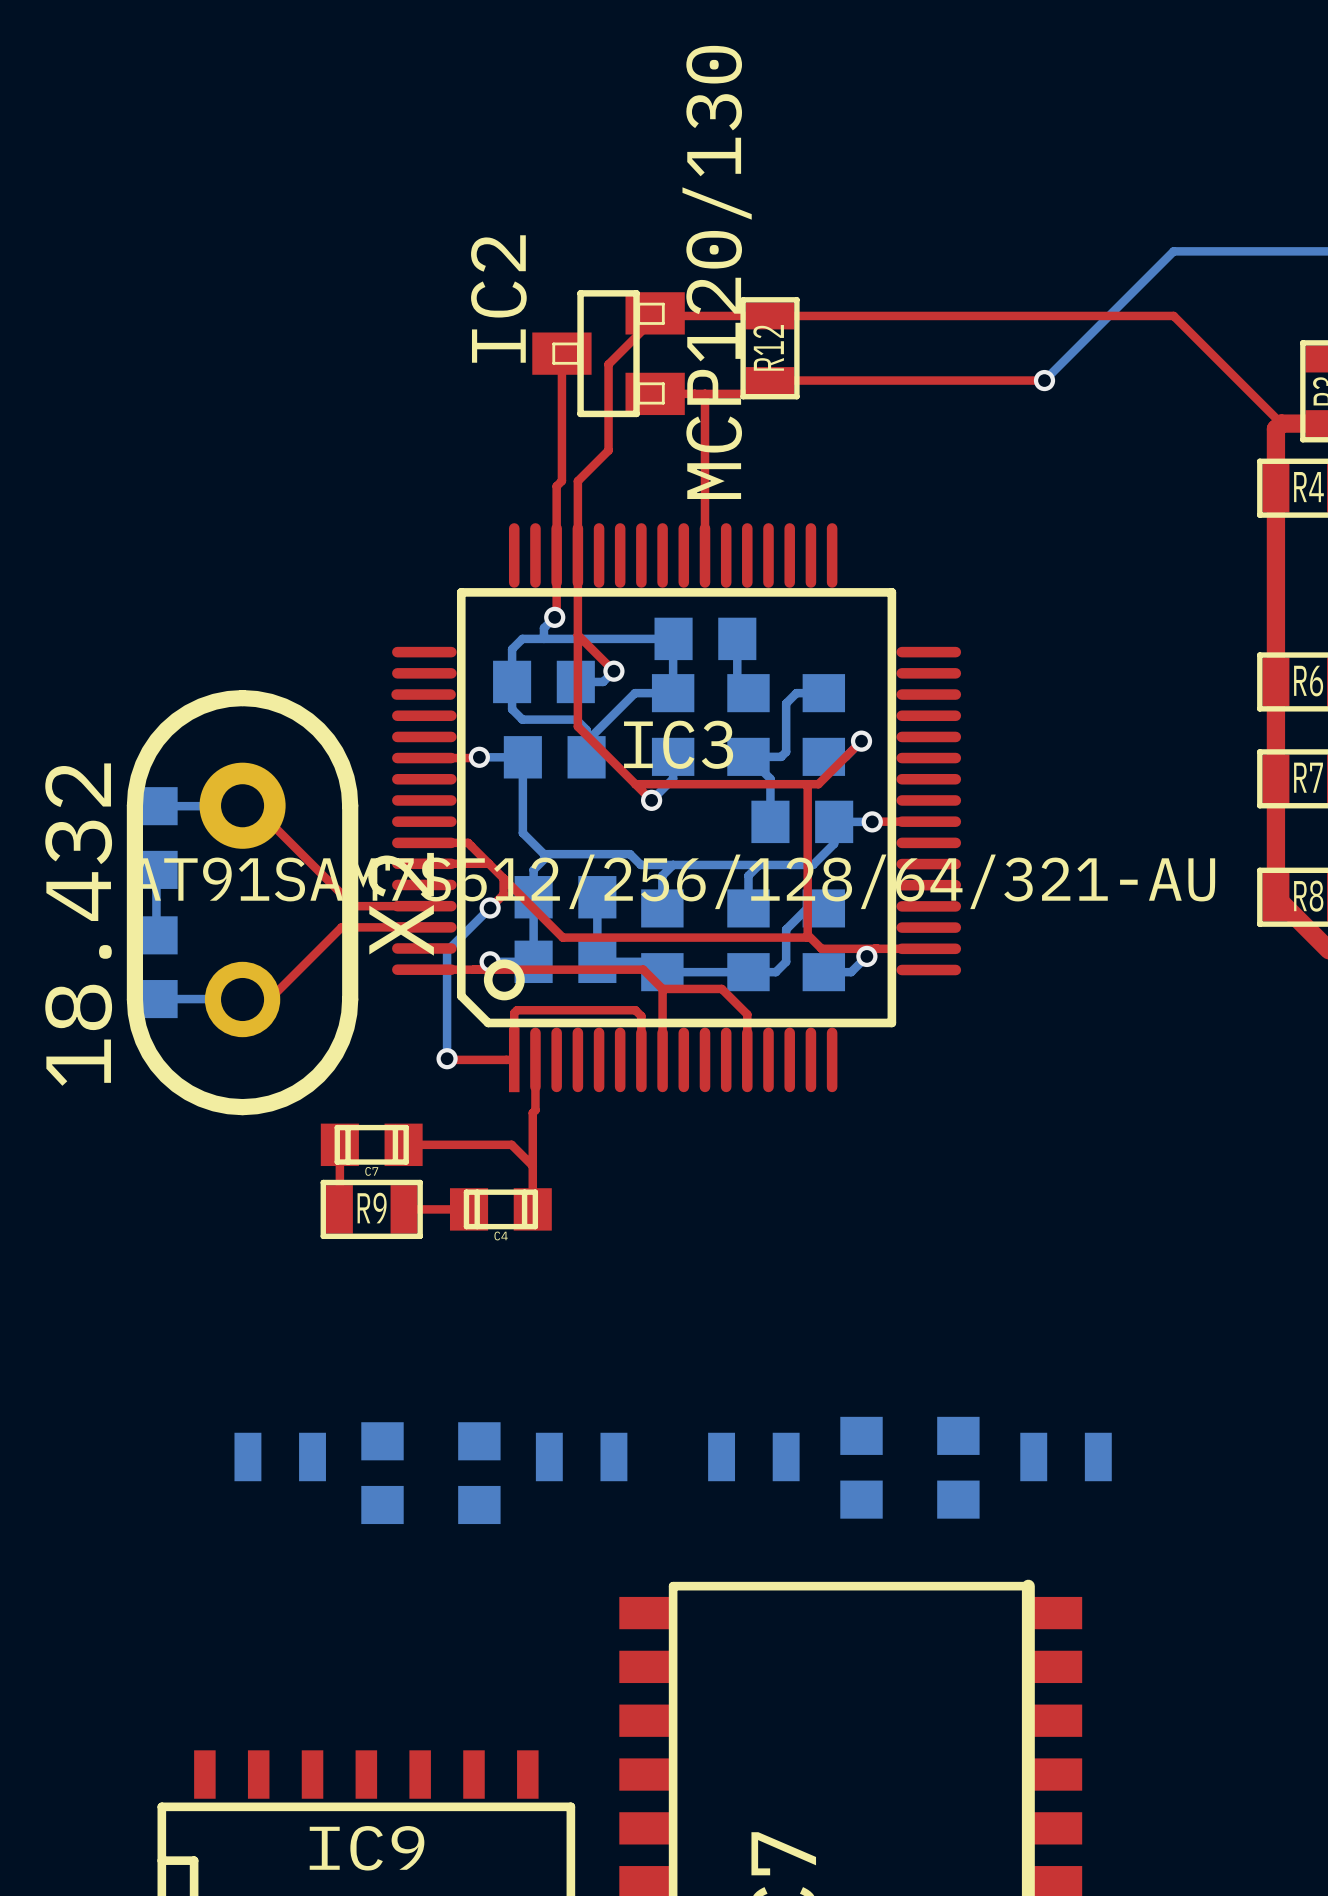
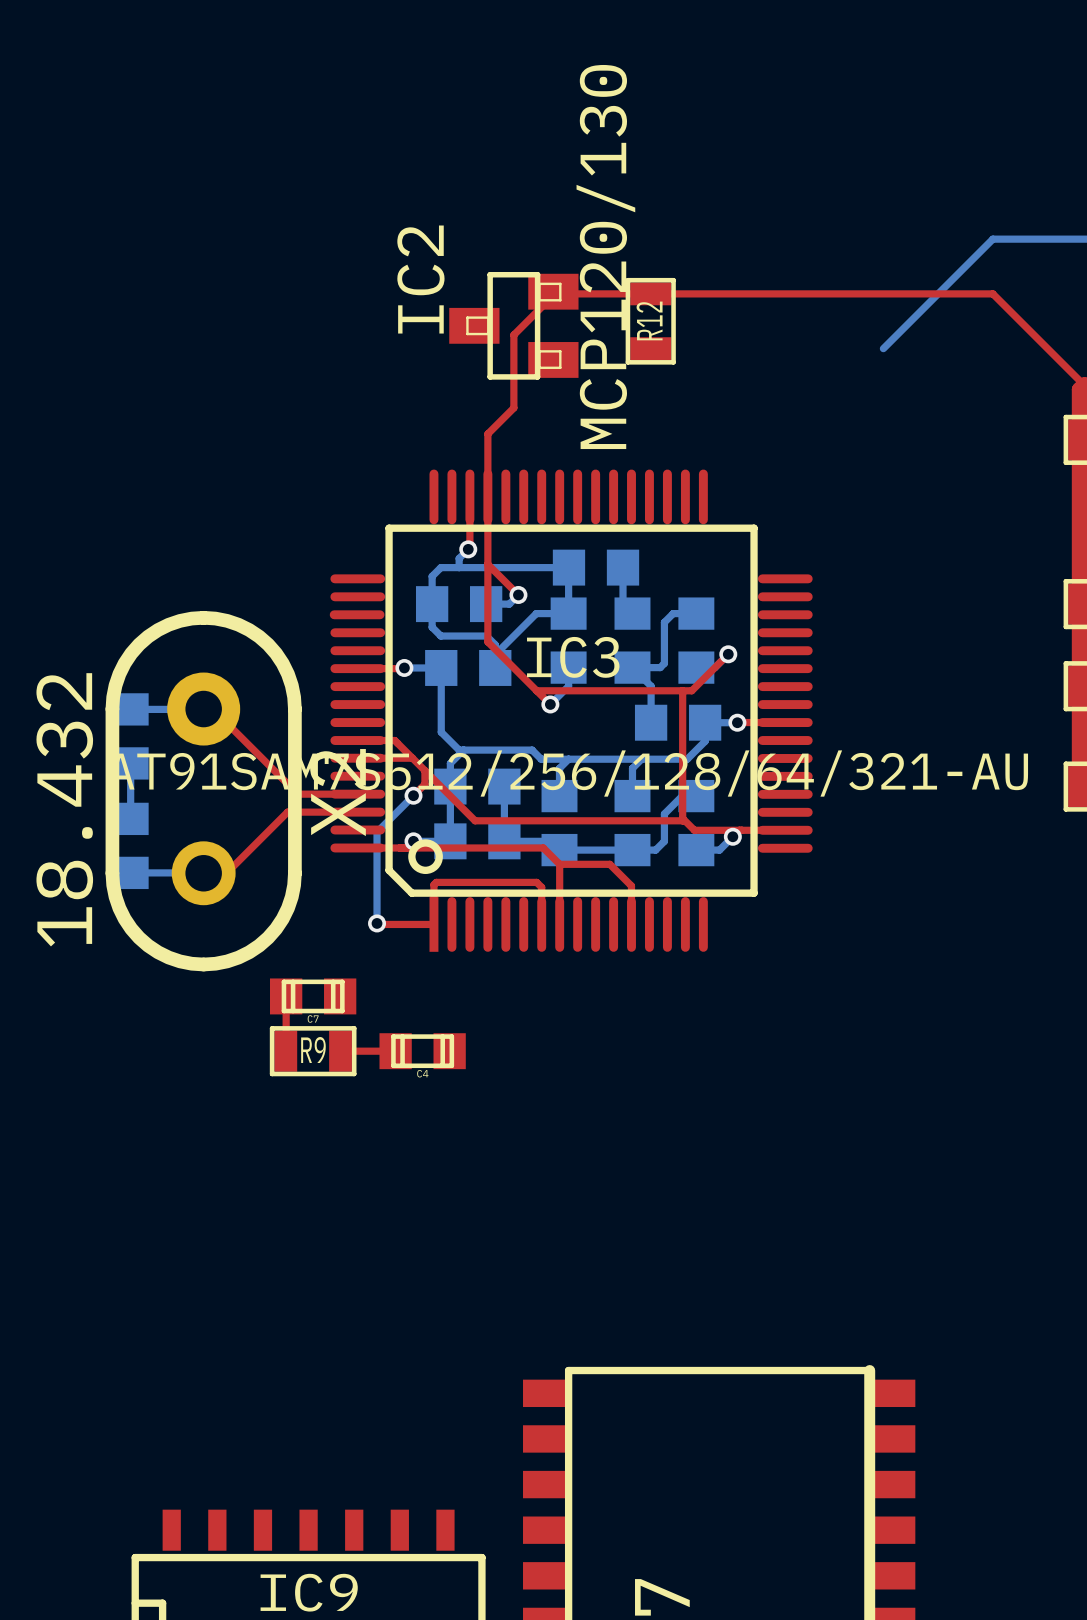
top track: (561, 353) (561, 480) (556, 486) (556, 555) -> none
top track: (1044, 380) (770, 380) (756, 393) (655, 393) -> none
via: (1044, 380) -> none
top track: (694, 393) (694, 396) (702, 396) (704, 393) (704, 555) -> none
top track: (535, 1059) (535, 1110) (532, 1112) (532, 1209) -> none
top track: (403, 1144) (511, 1144) (532, 1165) -> none
part: (280, 1456) -> none
part: (581, 1456) -> none
part: (753, 1456) -> none
part: (1066, 1456) -> none
part: (861, 1467) -> none
part: (958, 1467) -> none
part: (382, 1473) -> none
part: (479, 1473) -> none

